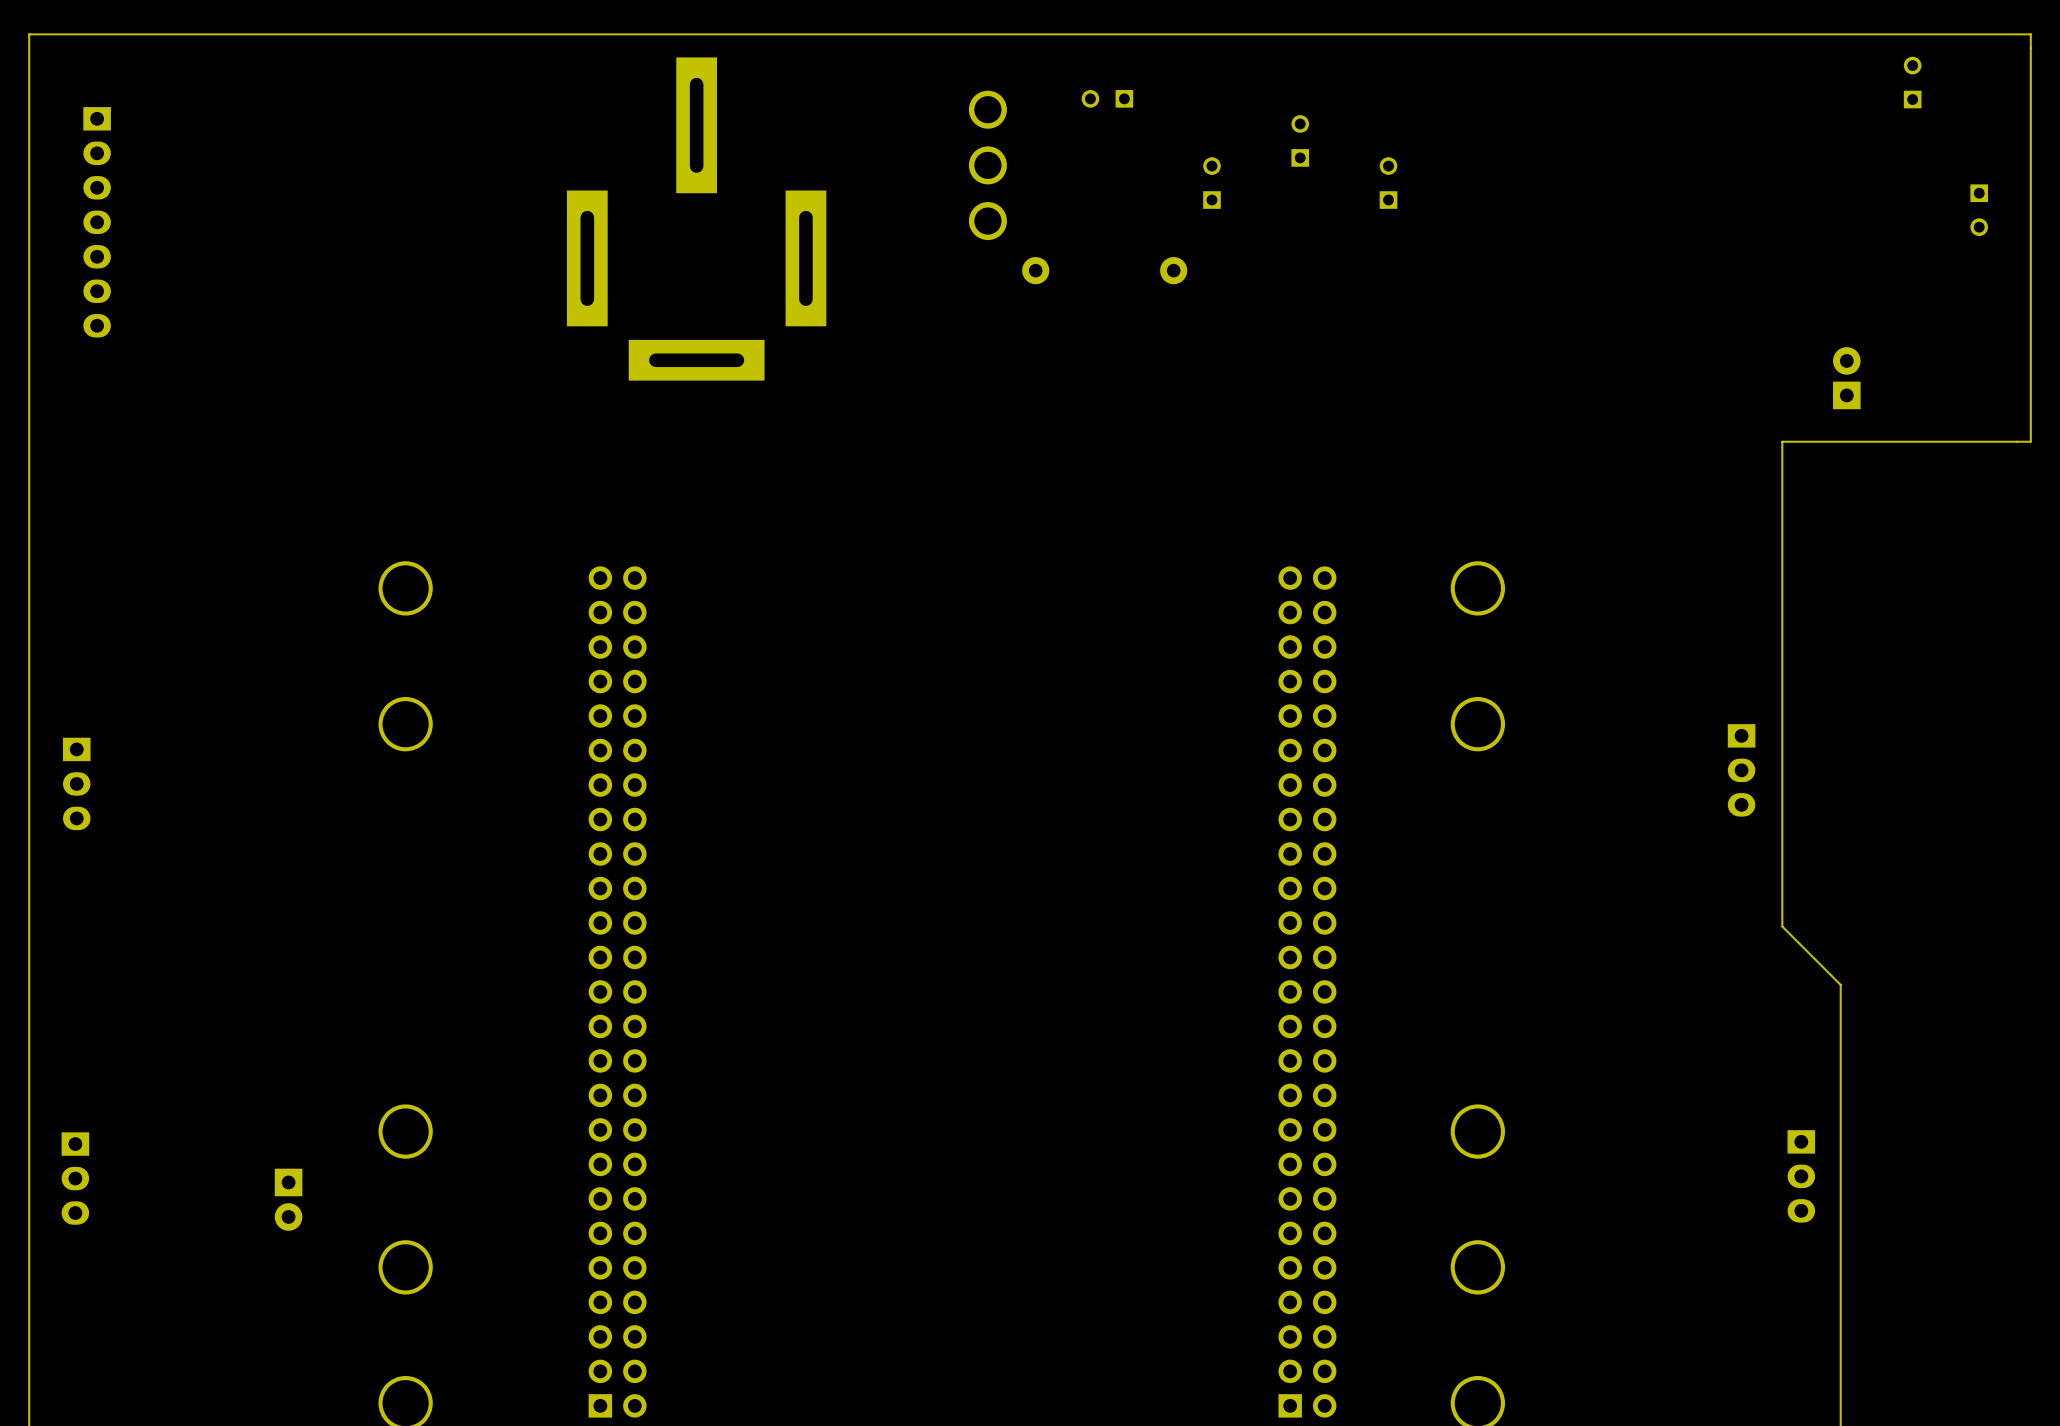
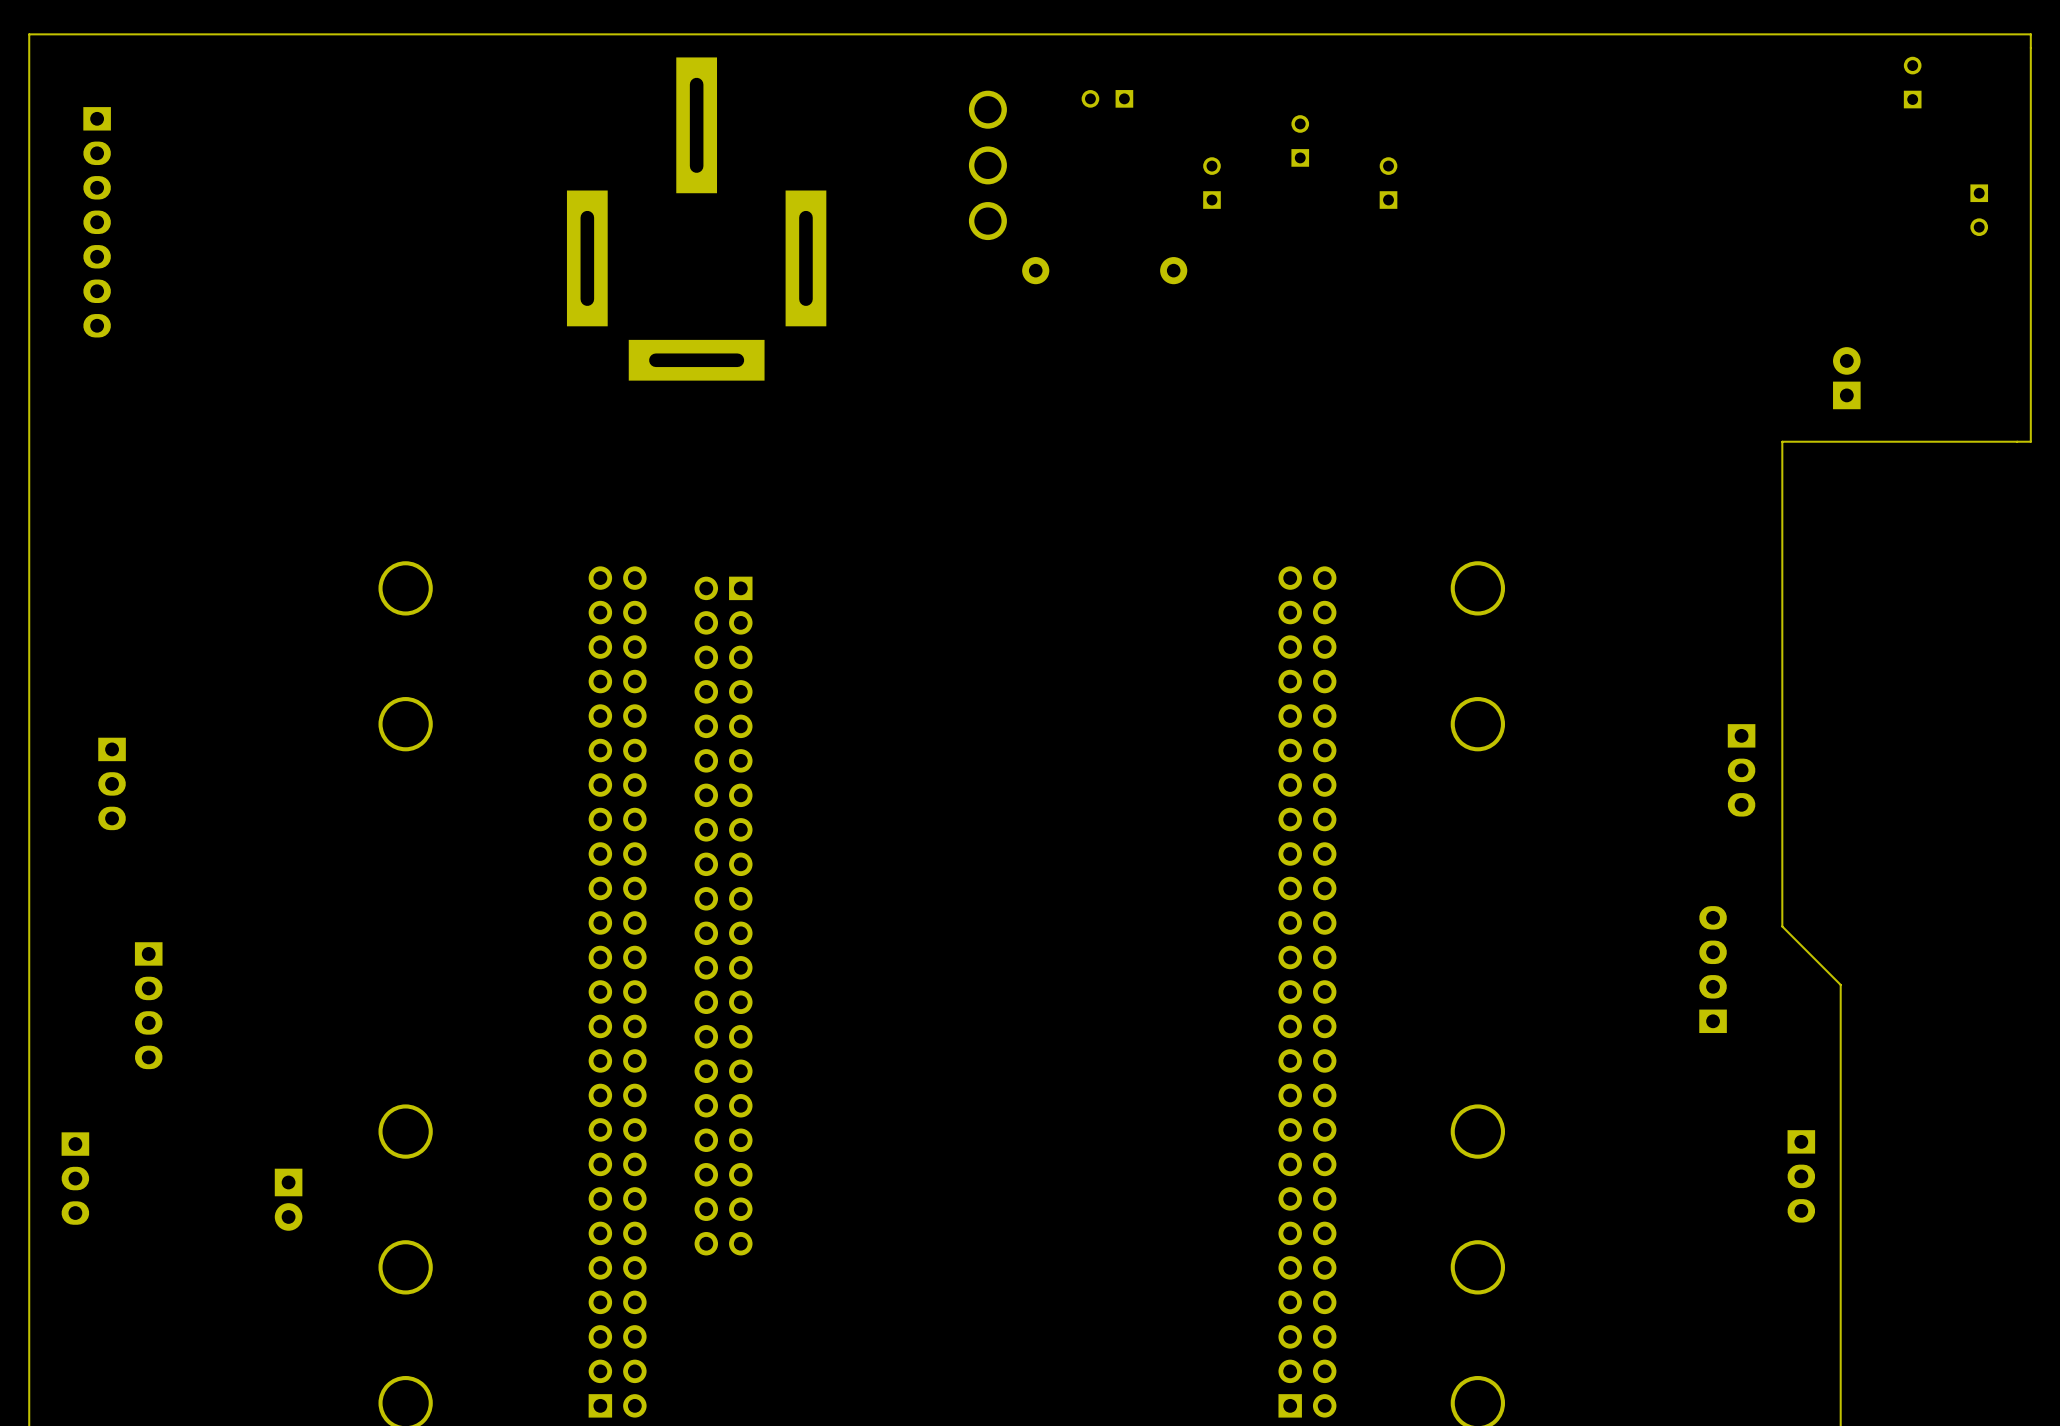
part position: (76, 783) -> (112, 783)
part: none -> (723, 916)
part: none -> (1713, 969)
part: none -> (148, 1005)

